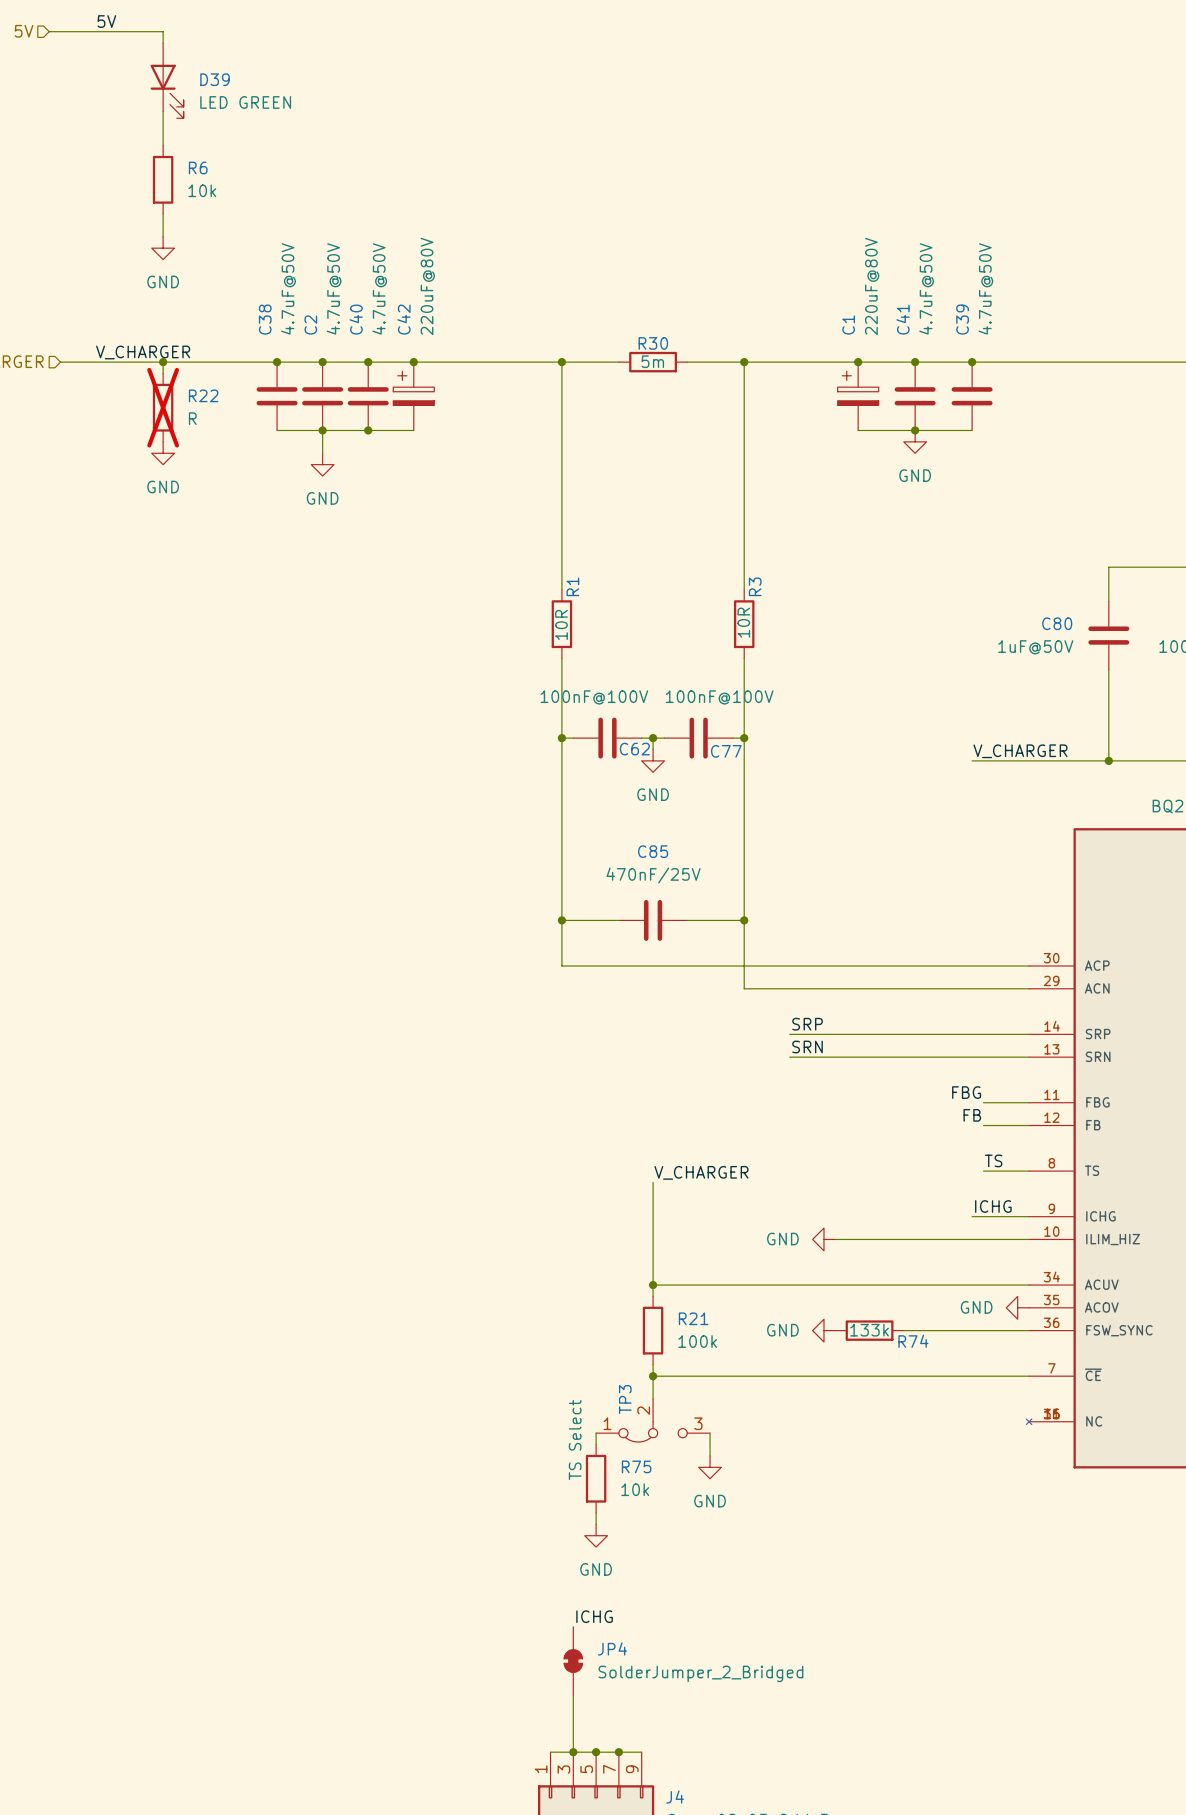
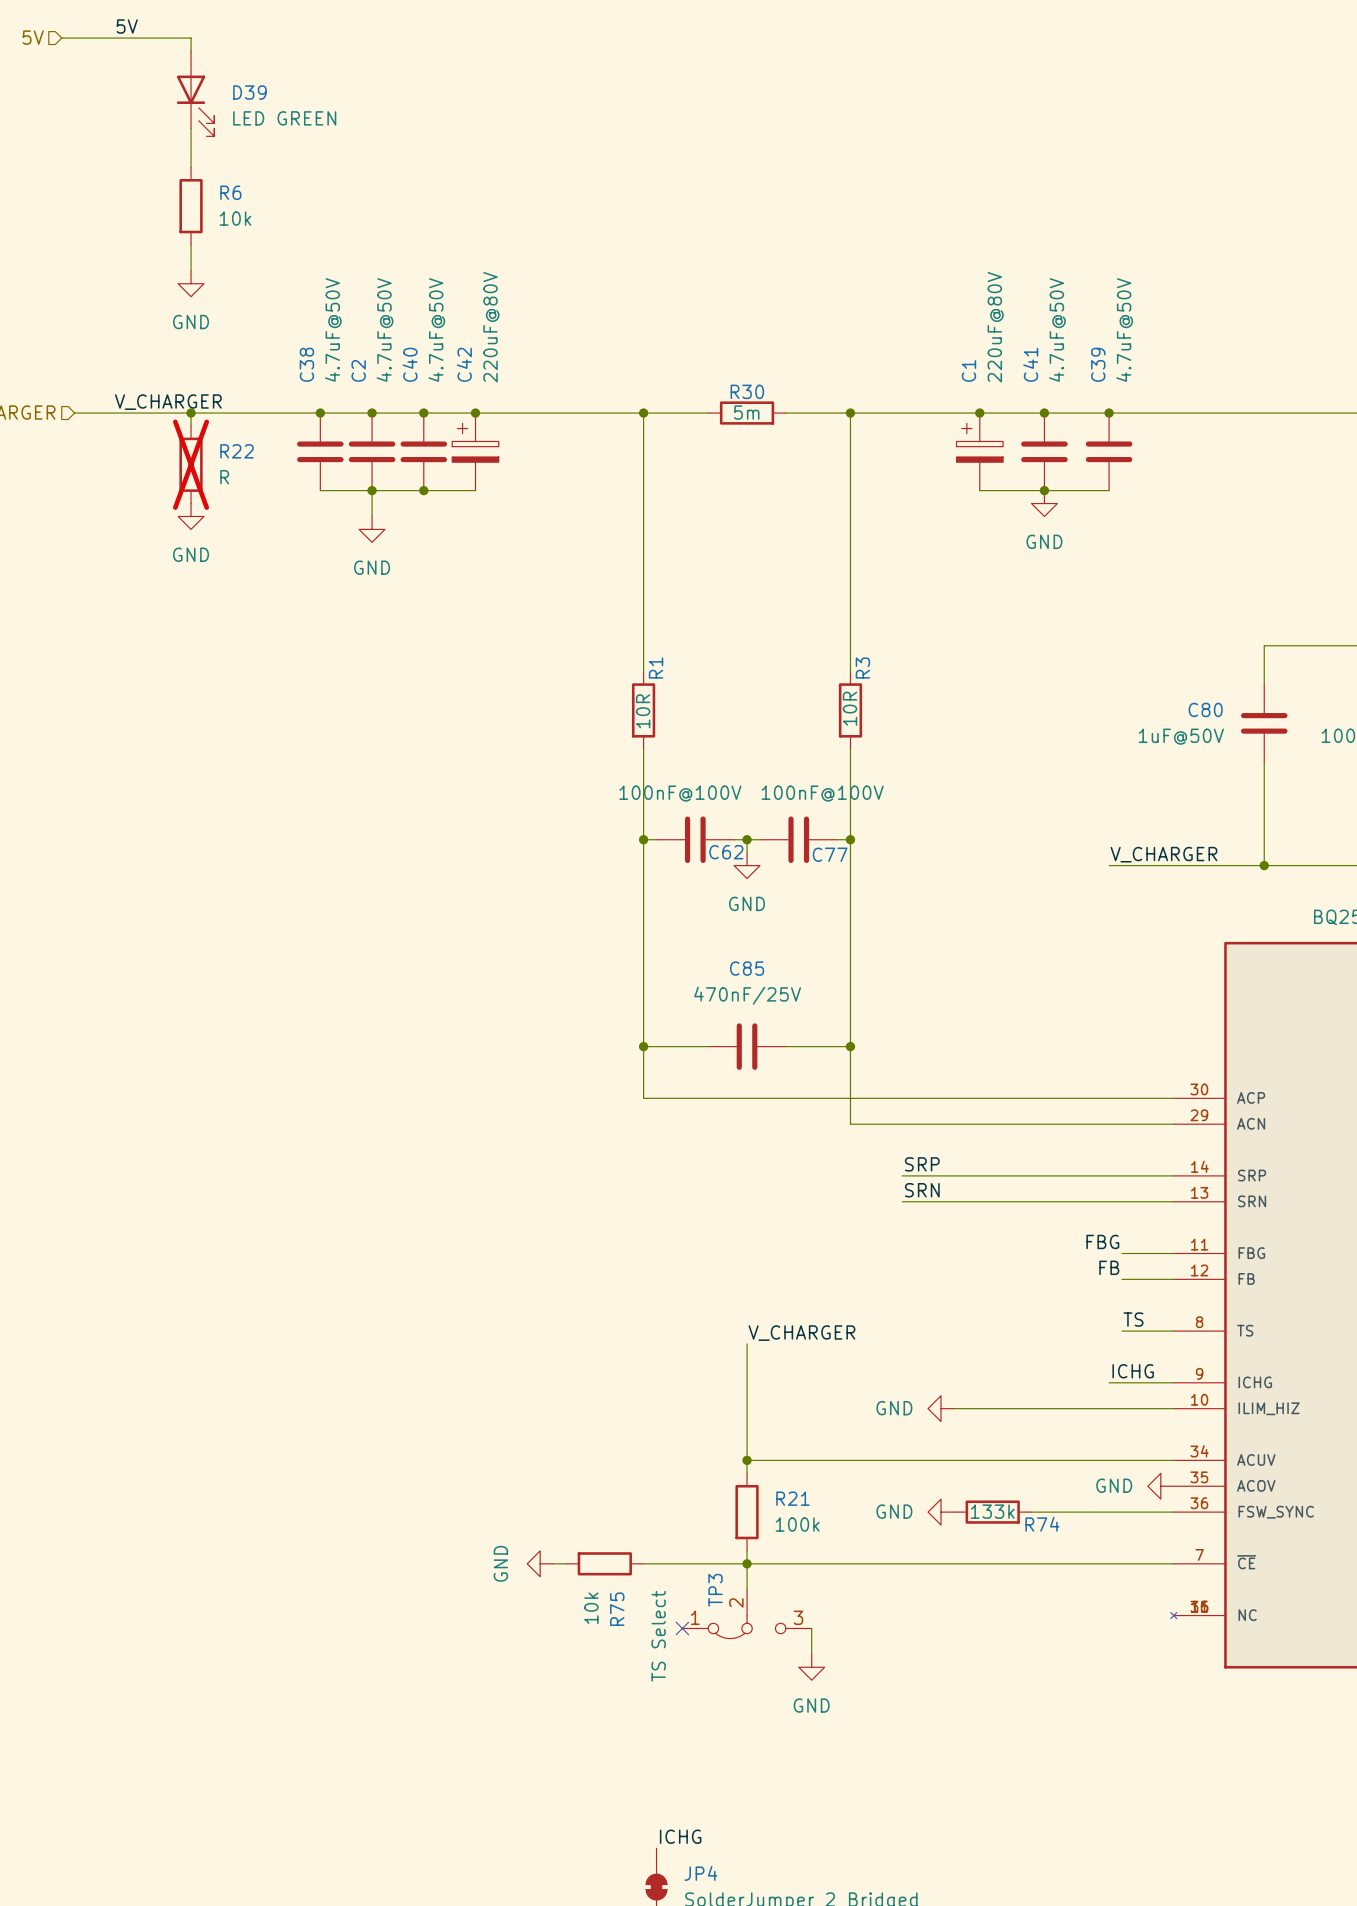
wire: none -> (553, 1563) (566, 1563)
wire: none -> (643, 1563) (747, 1563)
wire: (596, 1433) (596, 1444) -> none
no-connect mark: none -> (682, 1628)
R75 rotation: 0° (596, 1478) -> 90° clockwise (604, 1563)
R75 position: (596, 1478) -> (604, 1563)
wire: (596, 1512) (596, 1524) -> none
power symbol rotation: 0° (596, 1535) -> 90° clockwise (540, 1563)
power symbol position: GND (596, 1535) -> GND (540, 1563)

